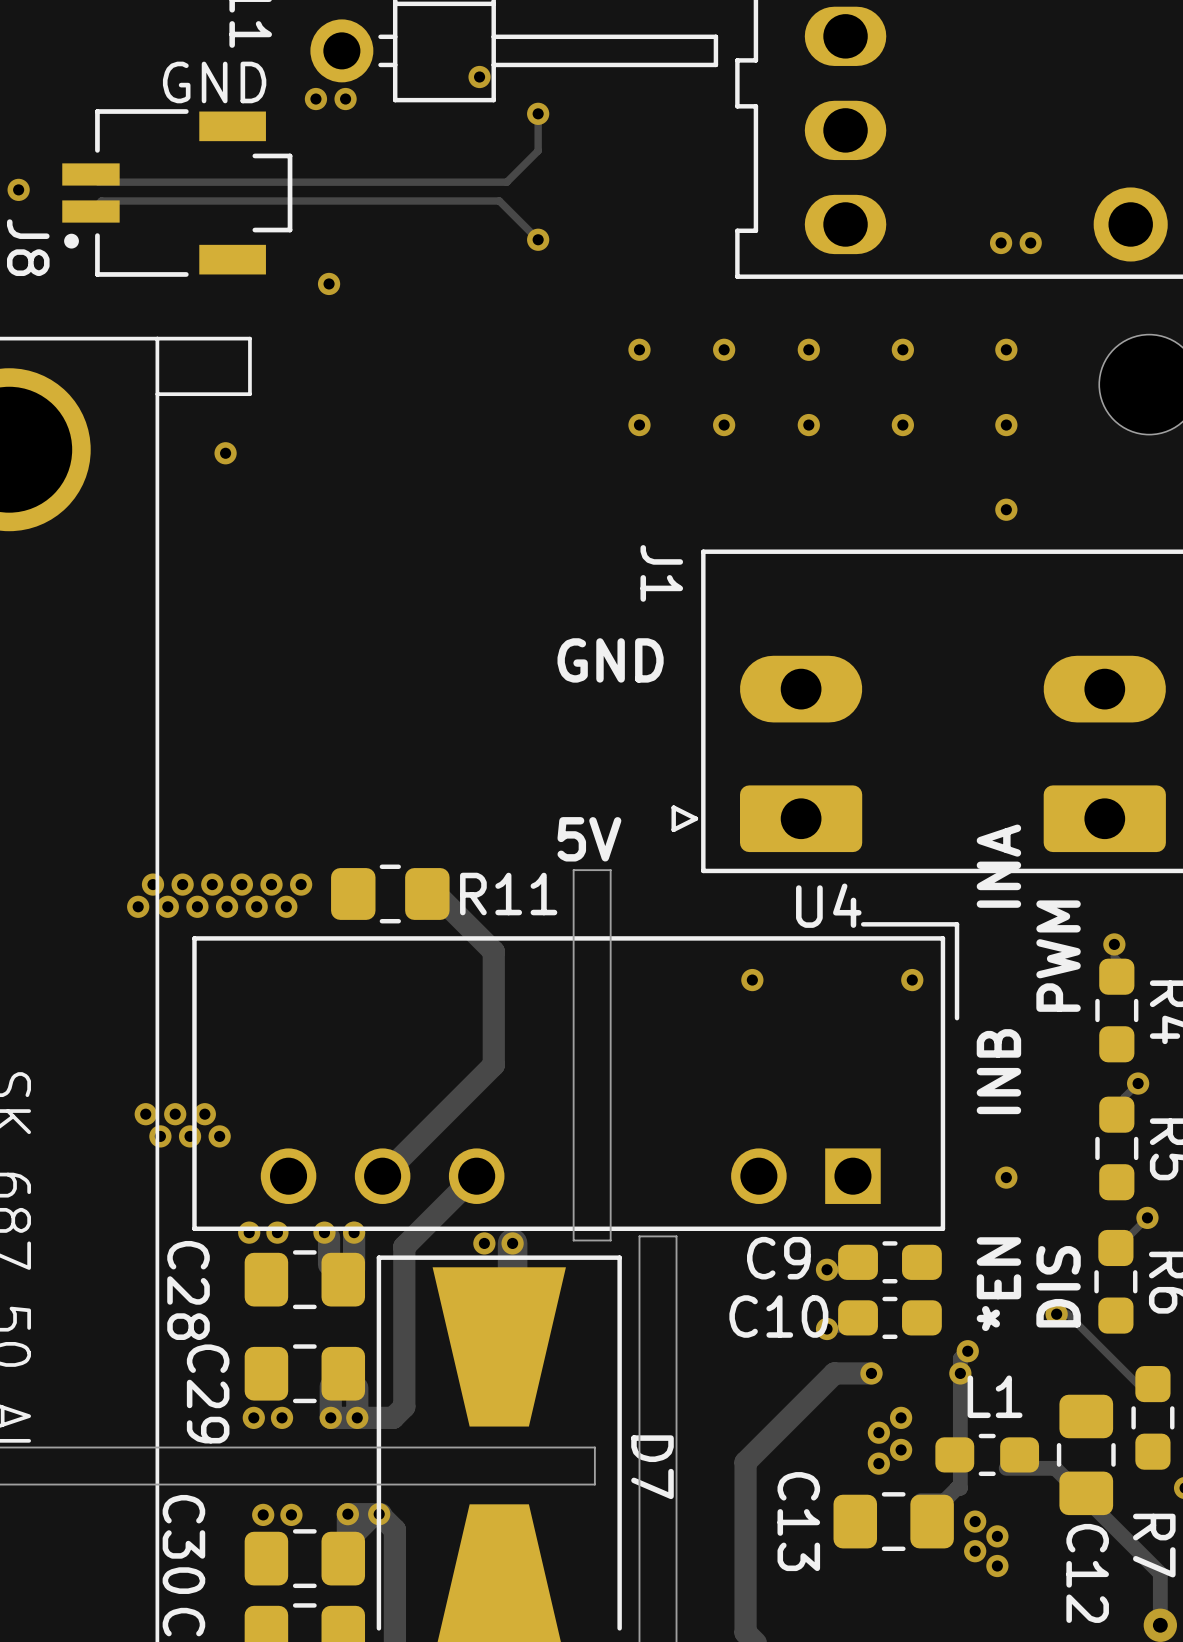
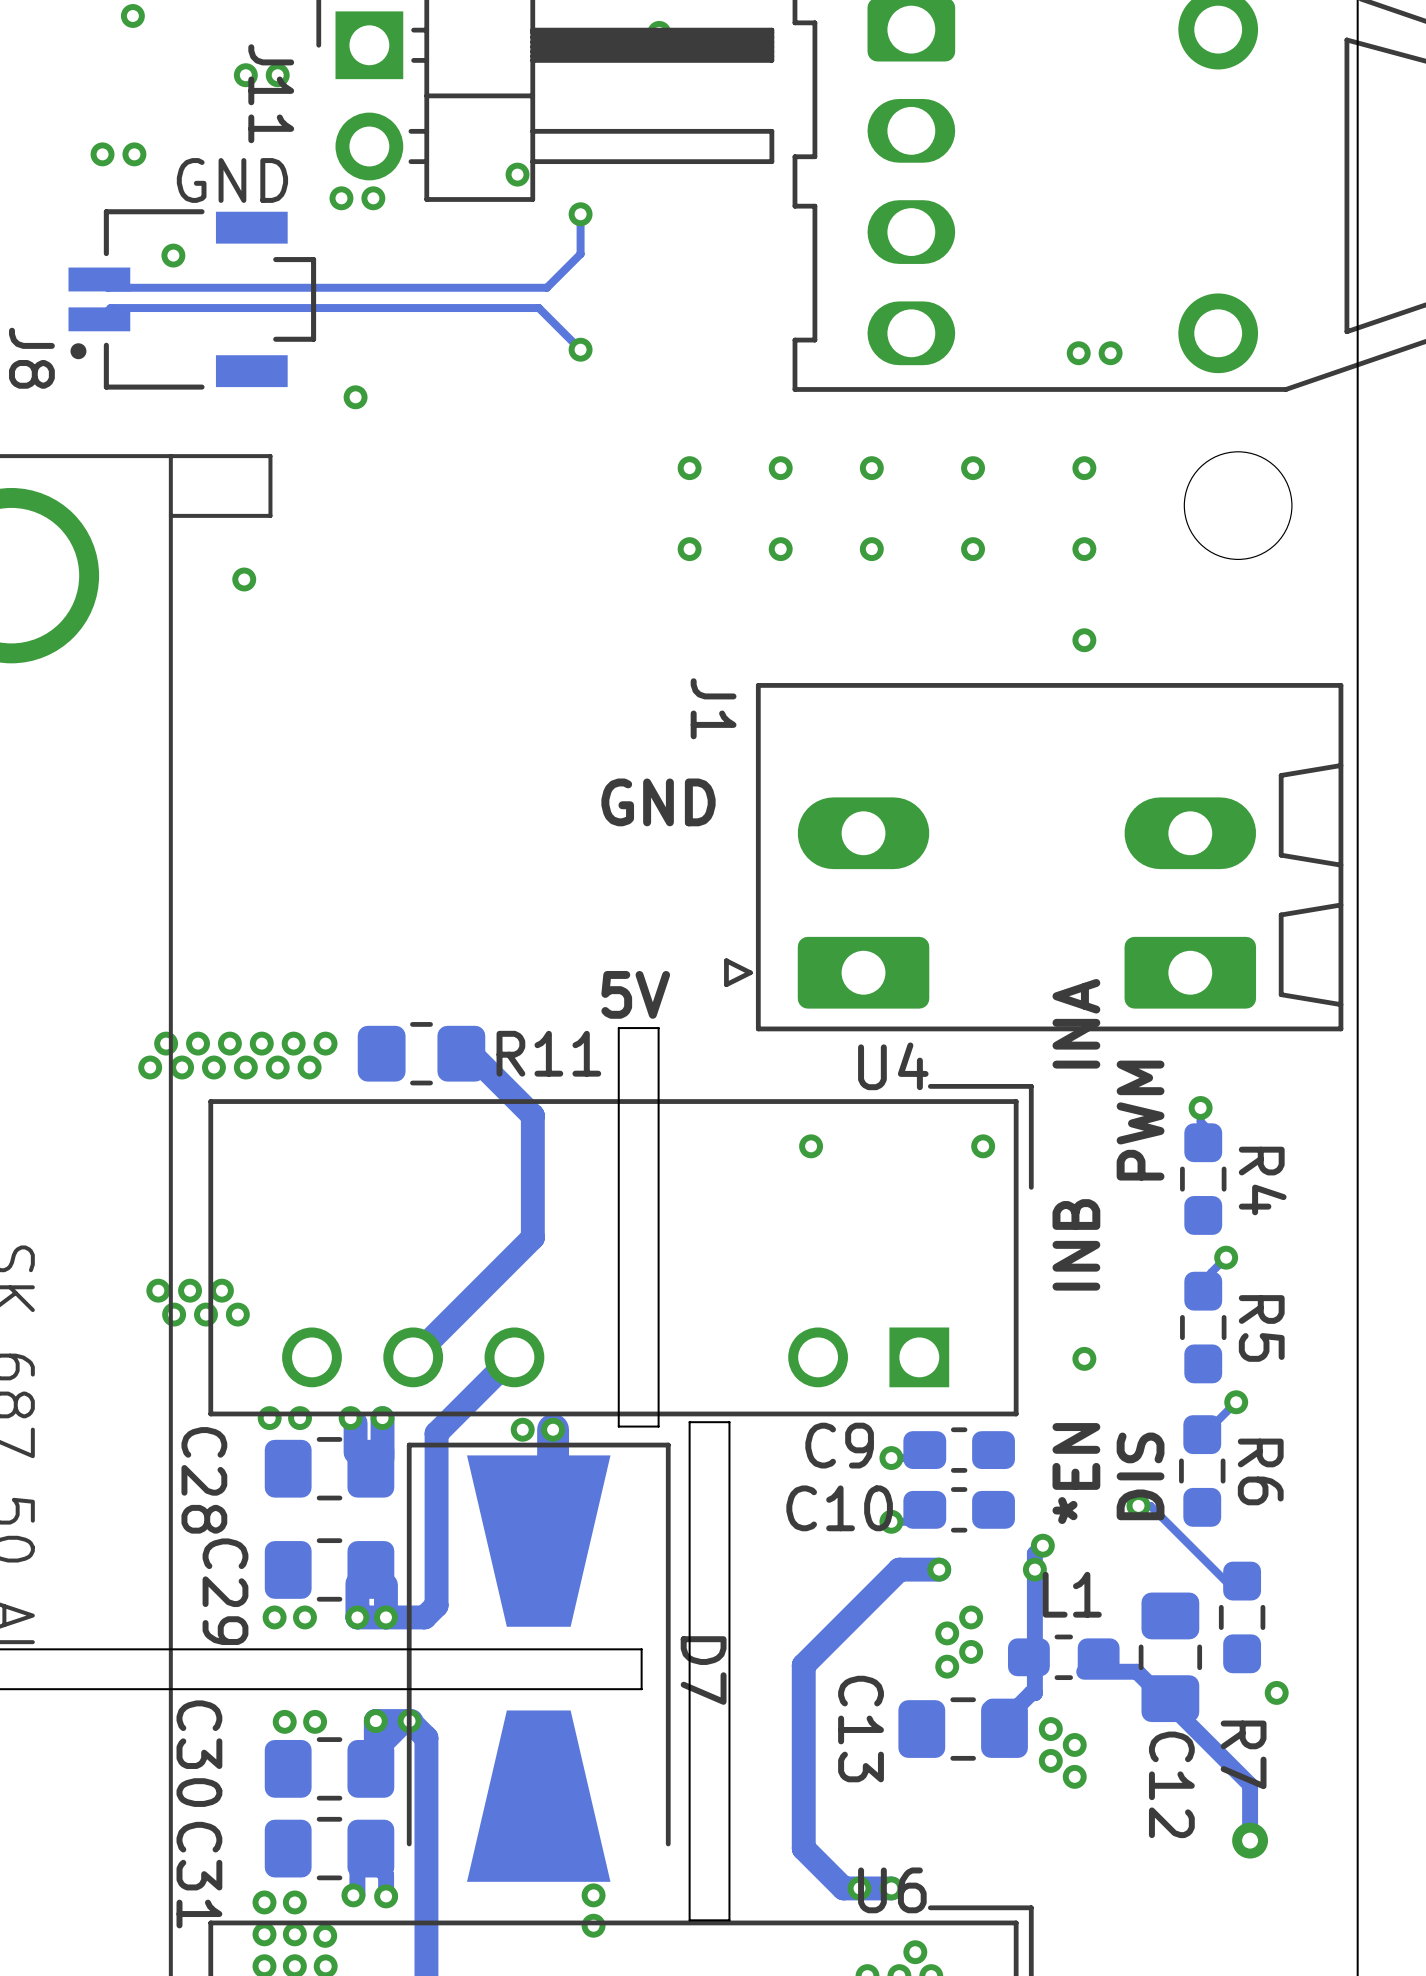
via: none -> (102, 154)
via: none -> (134, 154)
via: none -> (173, 255)
via: (18, 189) -> none

